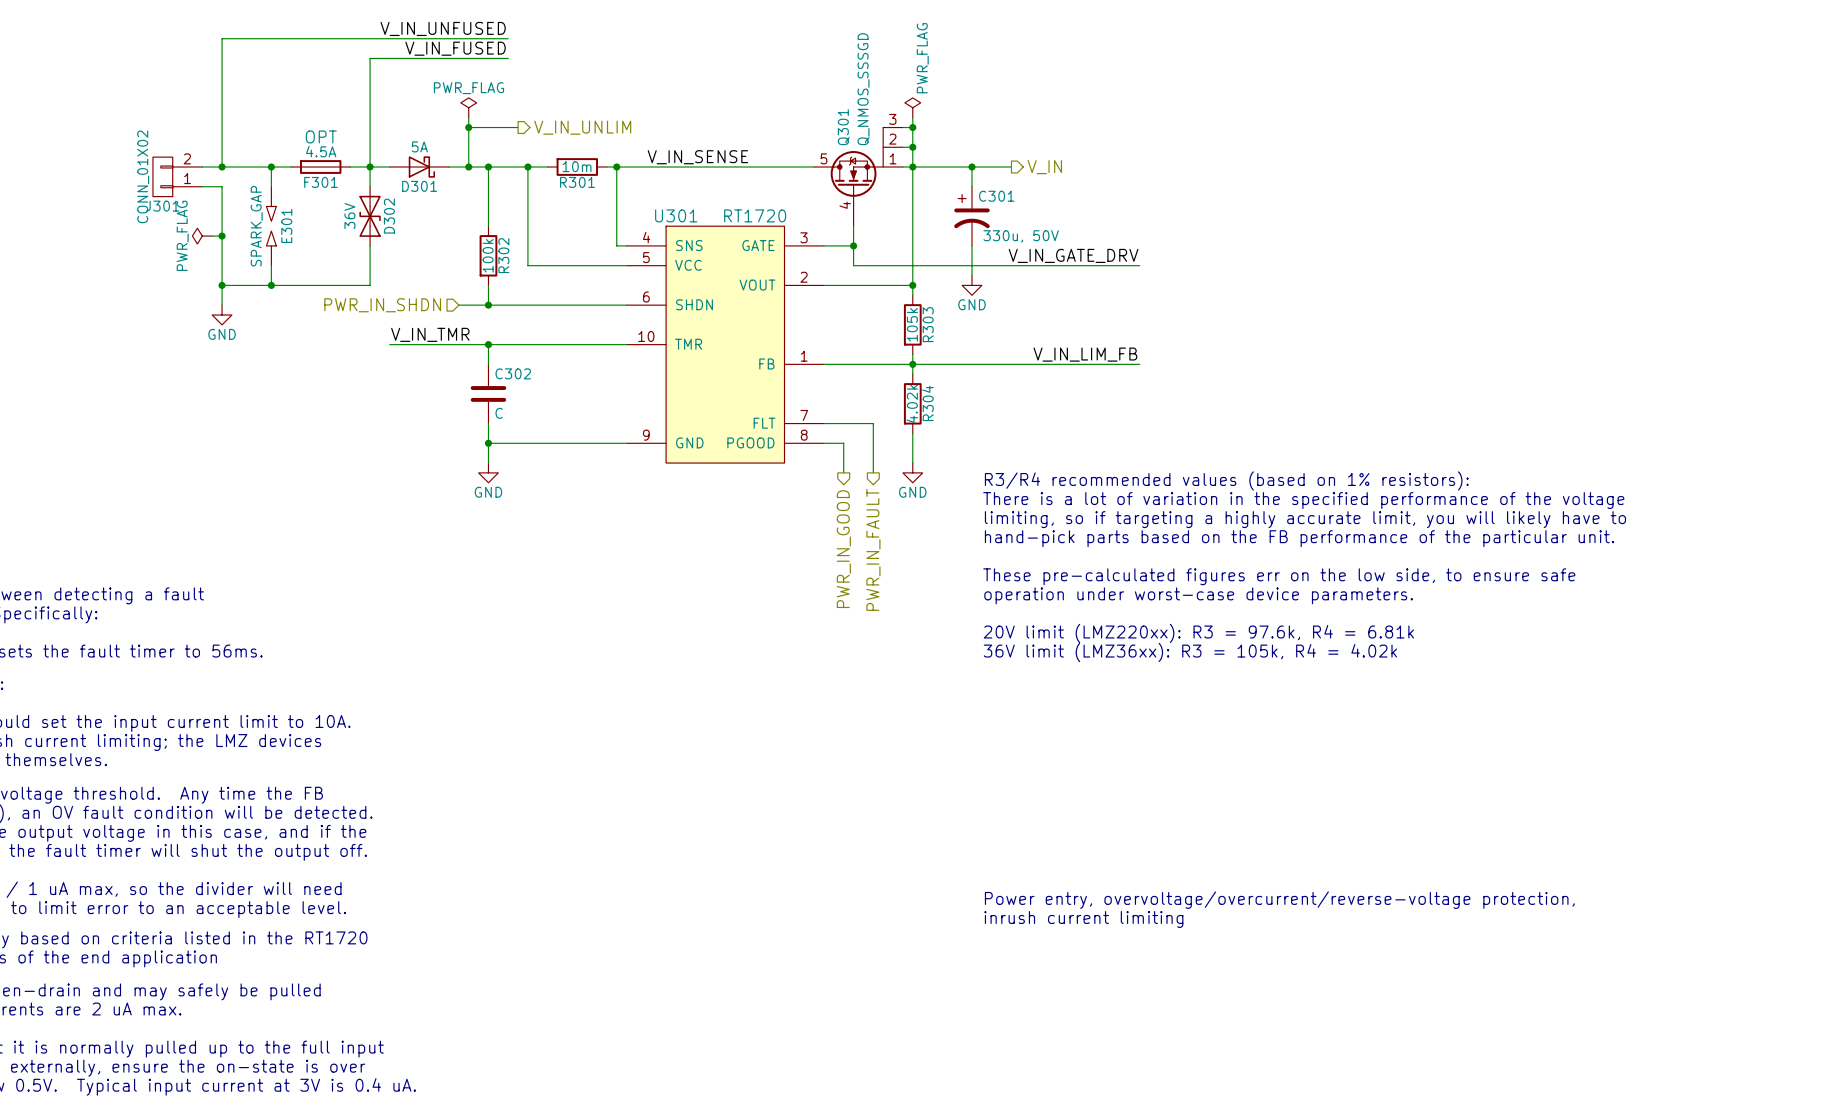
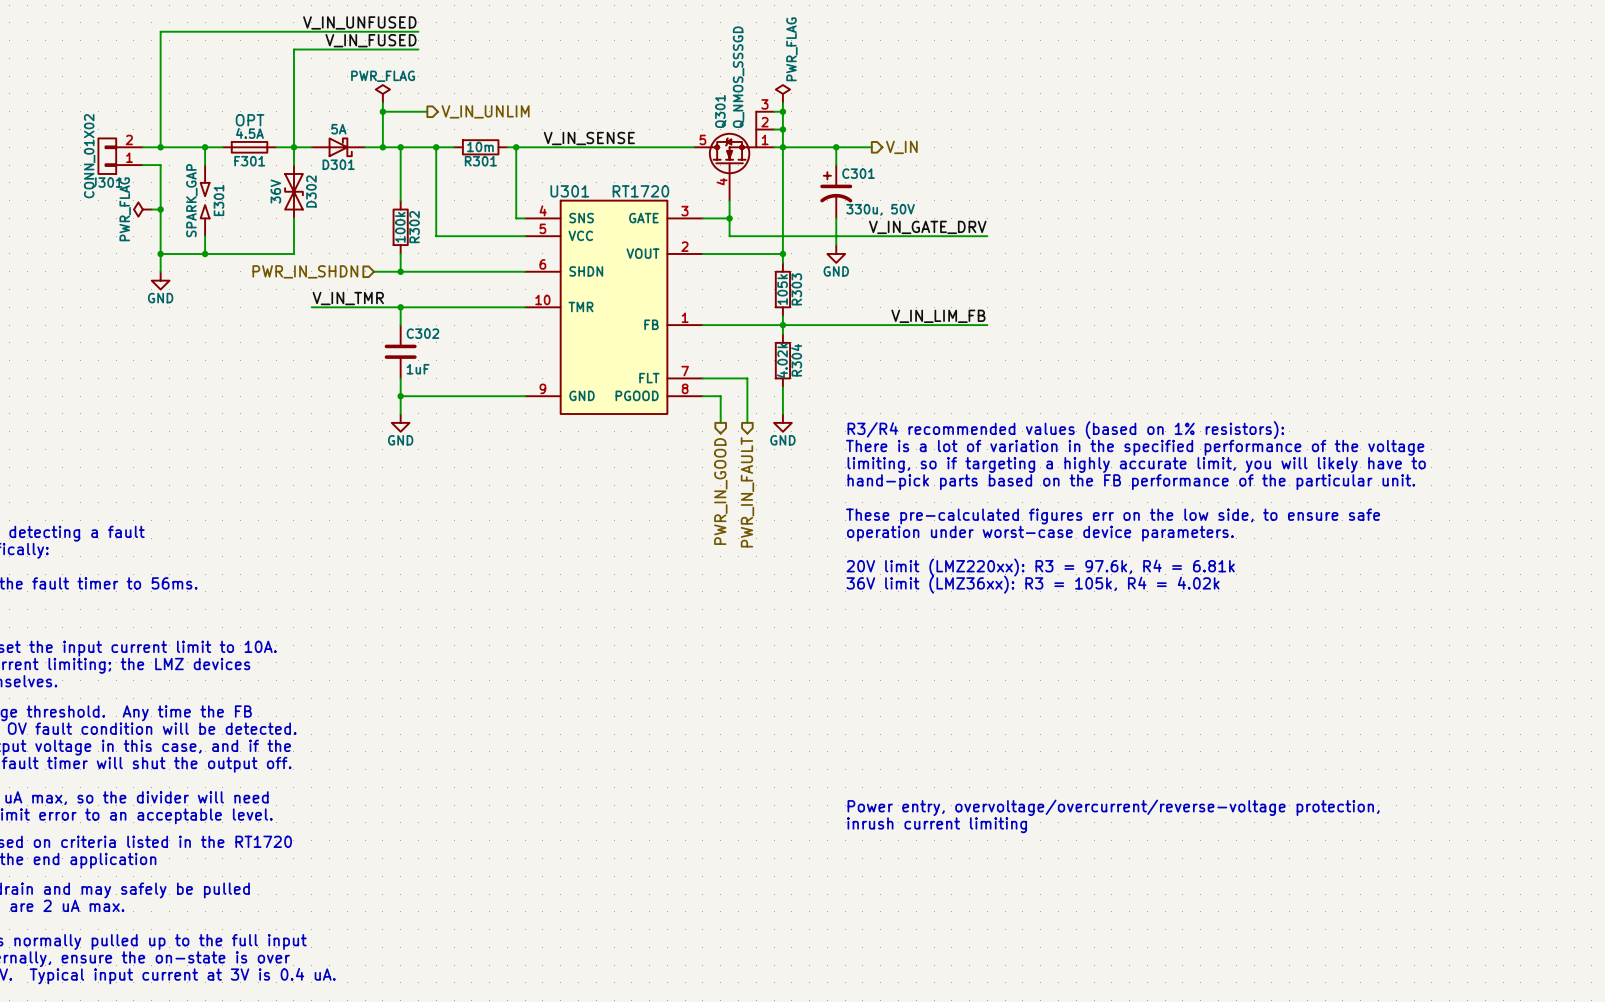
C302 value: C (499, 413) -> 1uF (418, 369)

